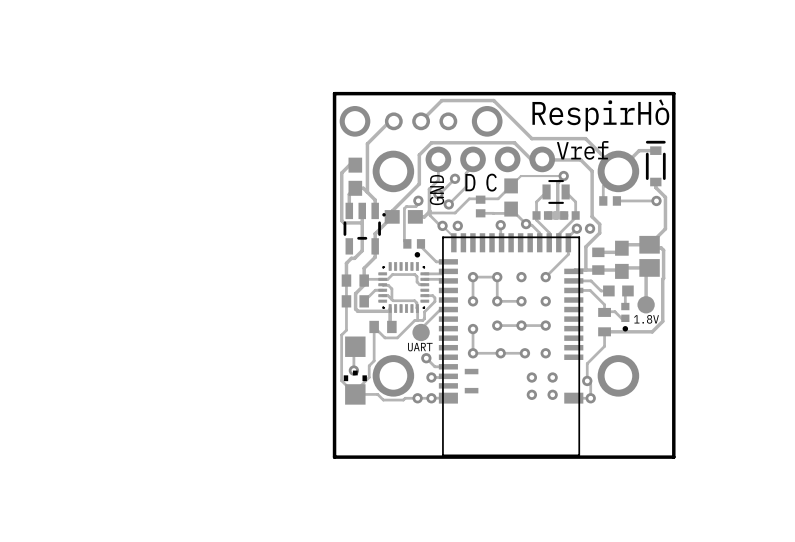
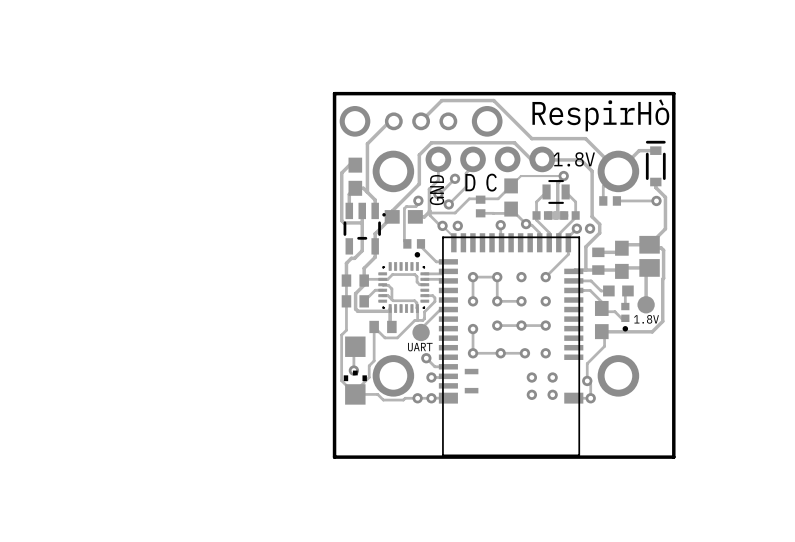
text: Vref (582, 150) -> none
text: none -> 1.8V (574, 159)
part footprint: [598, 307, 611, 337] -> [594, 300, 609, 340]

